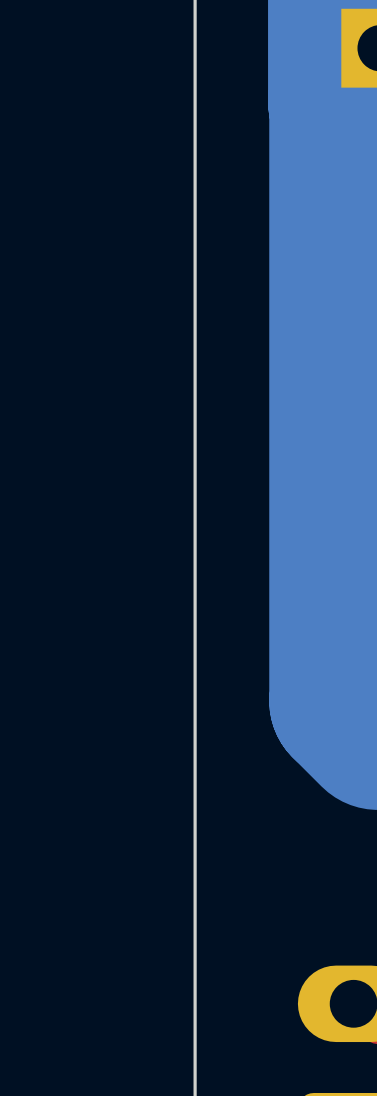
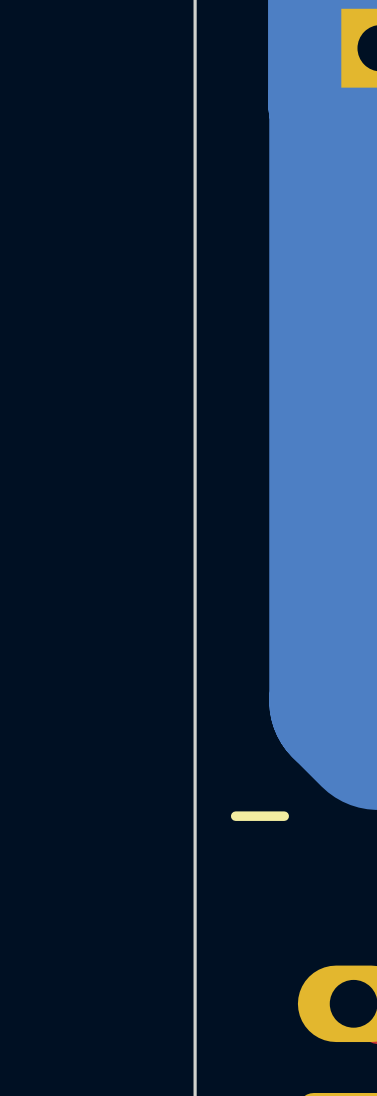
text: none -> - (259, 816)

